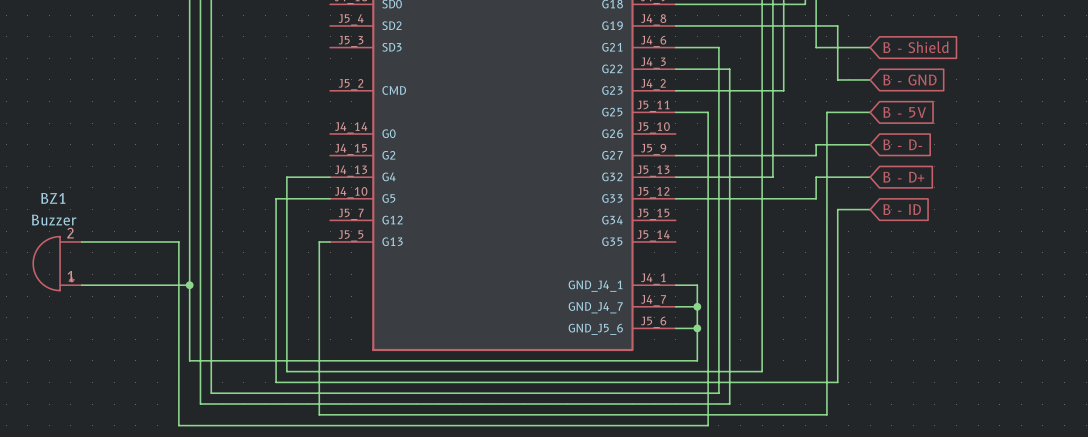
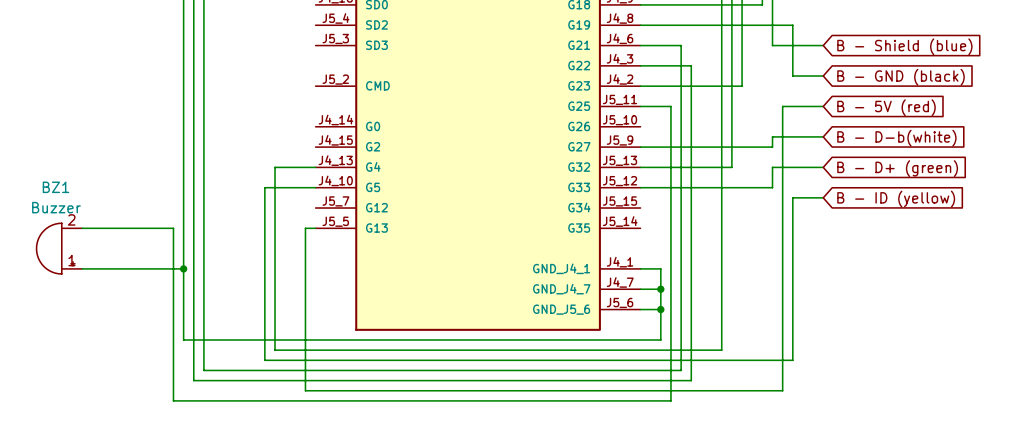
global label: B - Shield (915, 47) -> B - Shield (blue) (904, 46)
global label: B - GND (910, 80) -> B - GND (black) (901, 77)
global label: B - 5V (904, 112) -> B - 5V (red) (886, 107)
global label: B - D- (902, 144) -> B - D-b(white) (896, 138)
global label: B - D+ (903, 177) -> B - D+ (green) (897, 168)
global label: B - ID (902, 209) -> B - ID (yellow) (896, 199)

